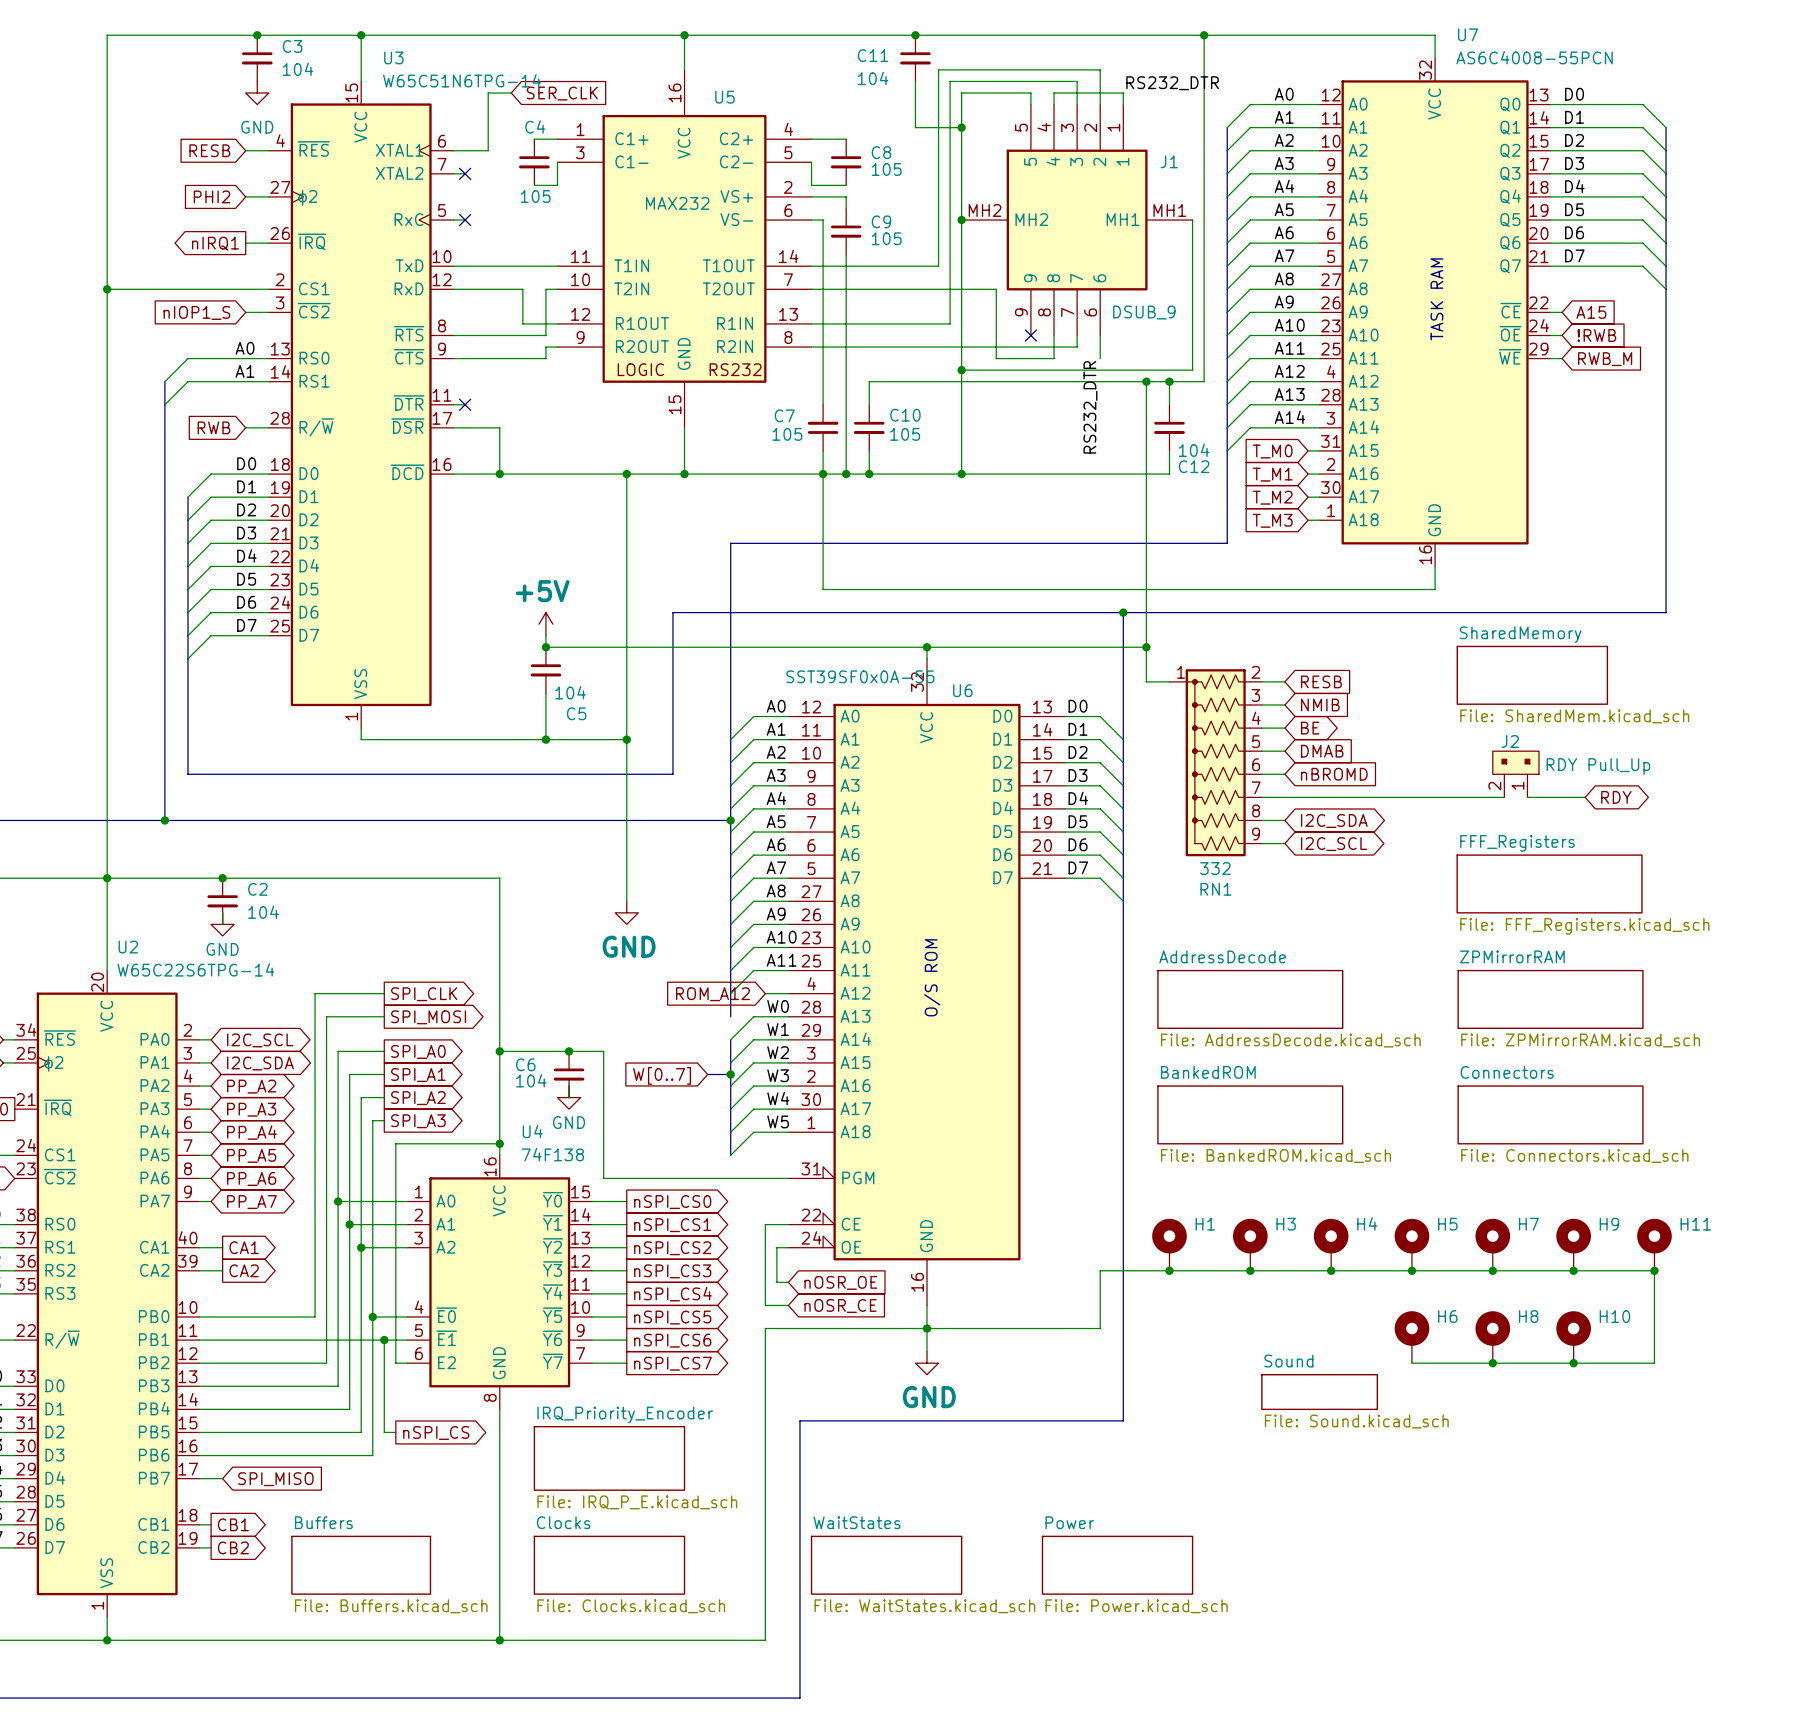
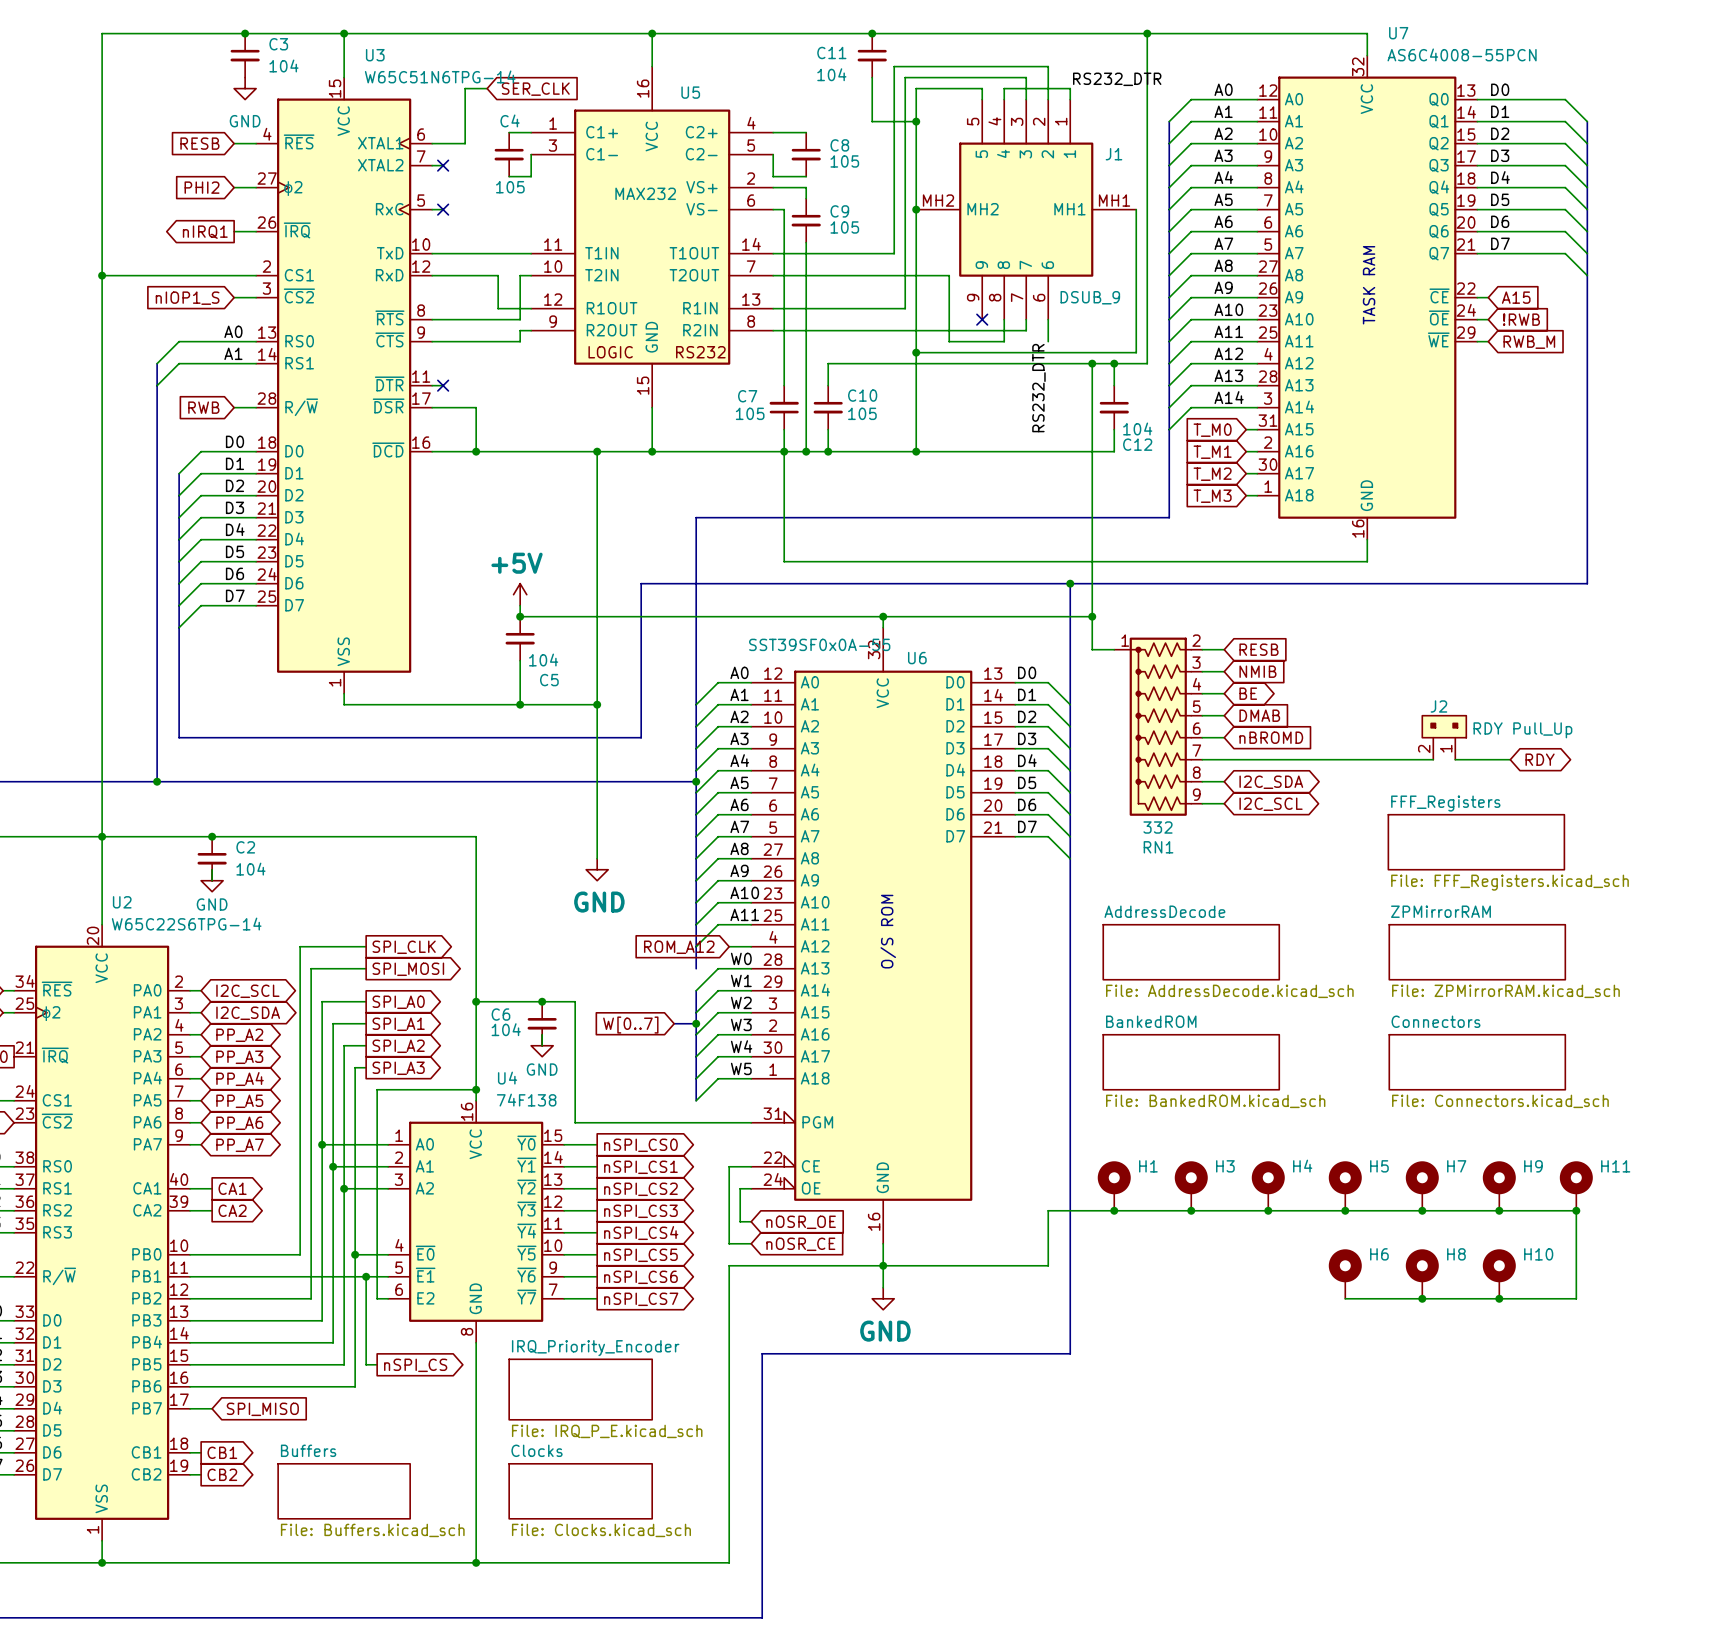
sheet SharedMemory: File: SharedMem.kicad_sch (1532, 675) -> none
sheet Sound: File: Sound.kicad_sch (1319, 1392) -> none
sheet WaitStates: File: WaitStates.kicad_sch (886, 1565) -> none
sheet Power: File: Power.kicad_sch (1117, 1565) -> none

